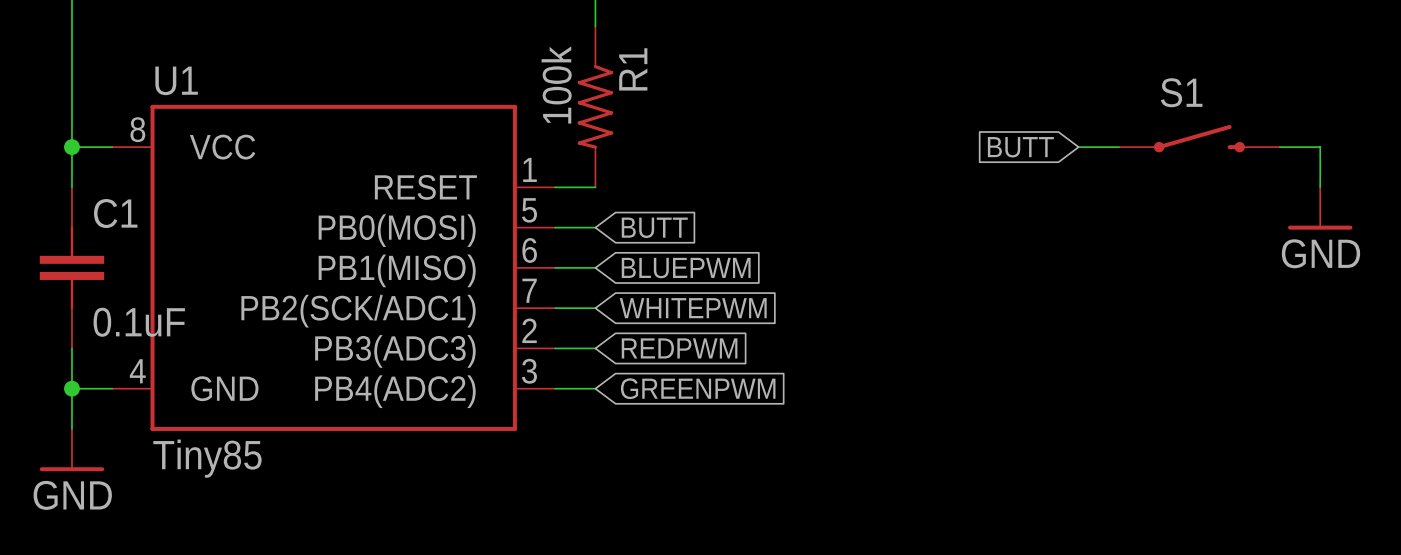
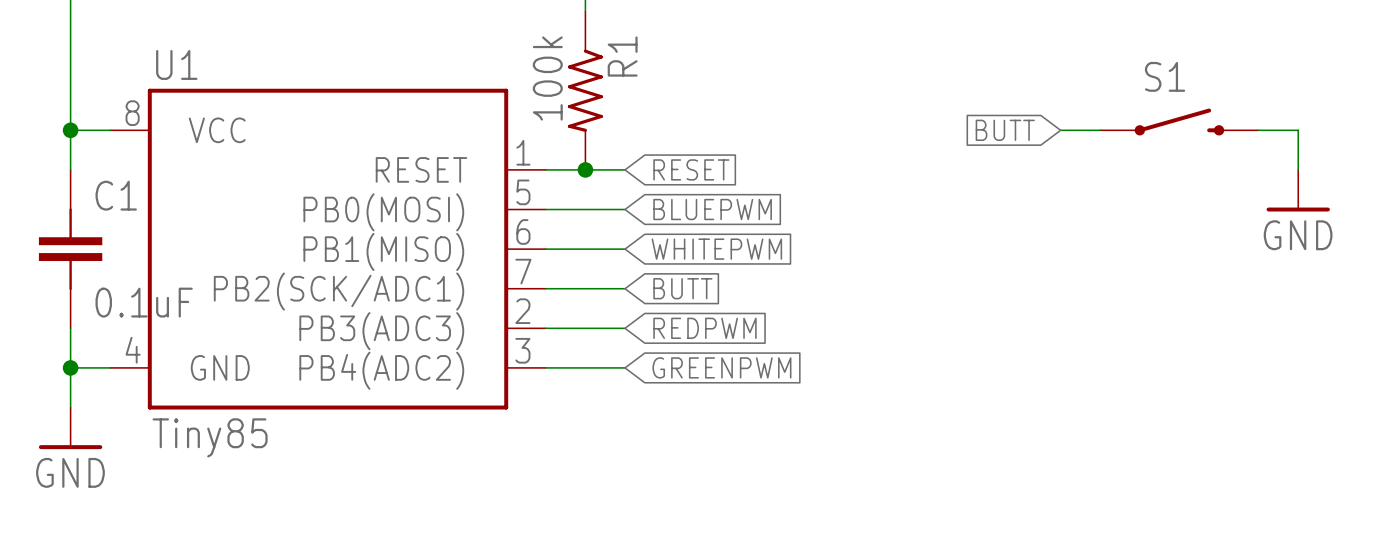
wire: none -> (585, 169) (625, 169)
junction: none -> (585, 169)
global label: none -> RESET (691, 169)
wire: none -> (585, 209) (625, 209)
global label position: BUTT (654, 227) -> BUTT (682, 288)
wire: none -> (585, 249) (625, 249)
global label position: BLUEPWM (686, 268) -> BLUEPWM (712, 209)
wire: none -> (585, 288) (625, 288)
global label position: WHITEPWM (693, 308) -> WHITEPWM (716, 249)
wire: none -> (585, 328) (625, 328)
global label position: REDPWM (679, 348) -> REDPWM (704, 328)
wire: none -> (585, 367) (625, 367)
global label position: GREENPWM (698, 388) -> GREENPWM (721, 367)

